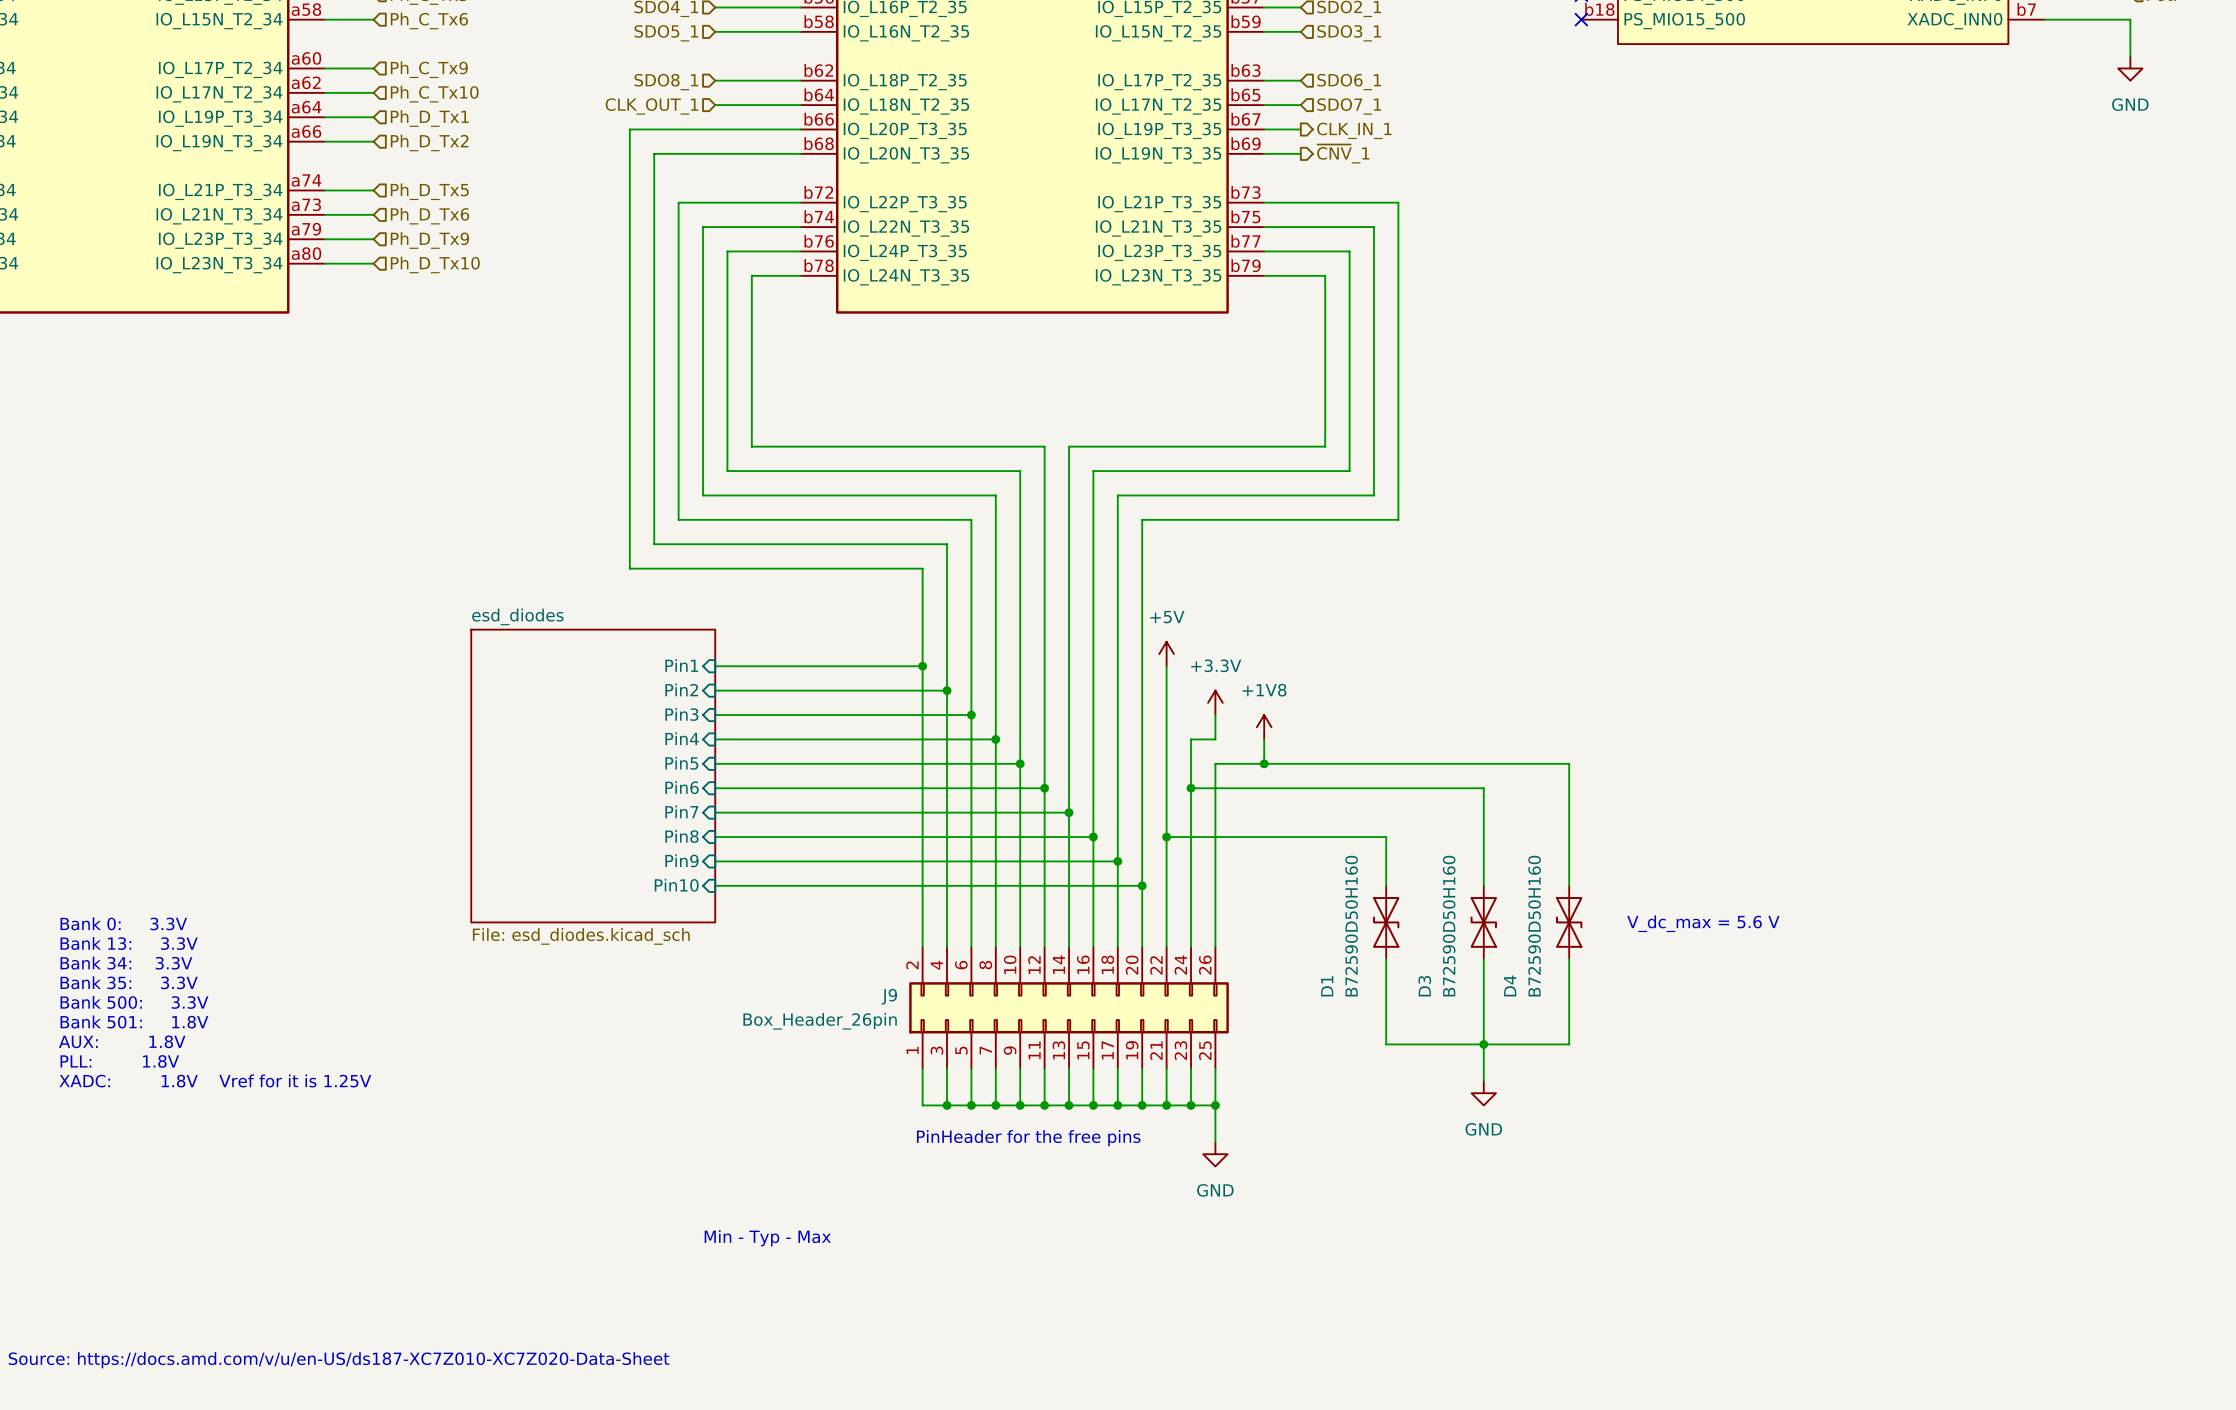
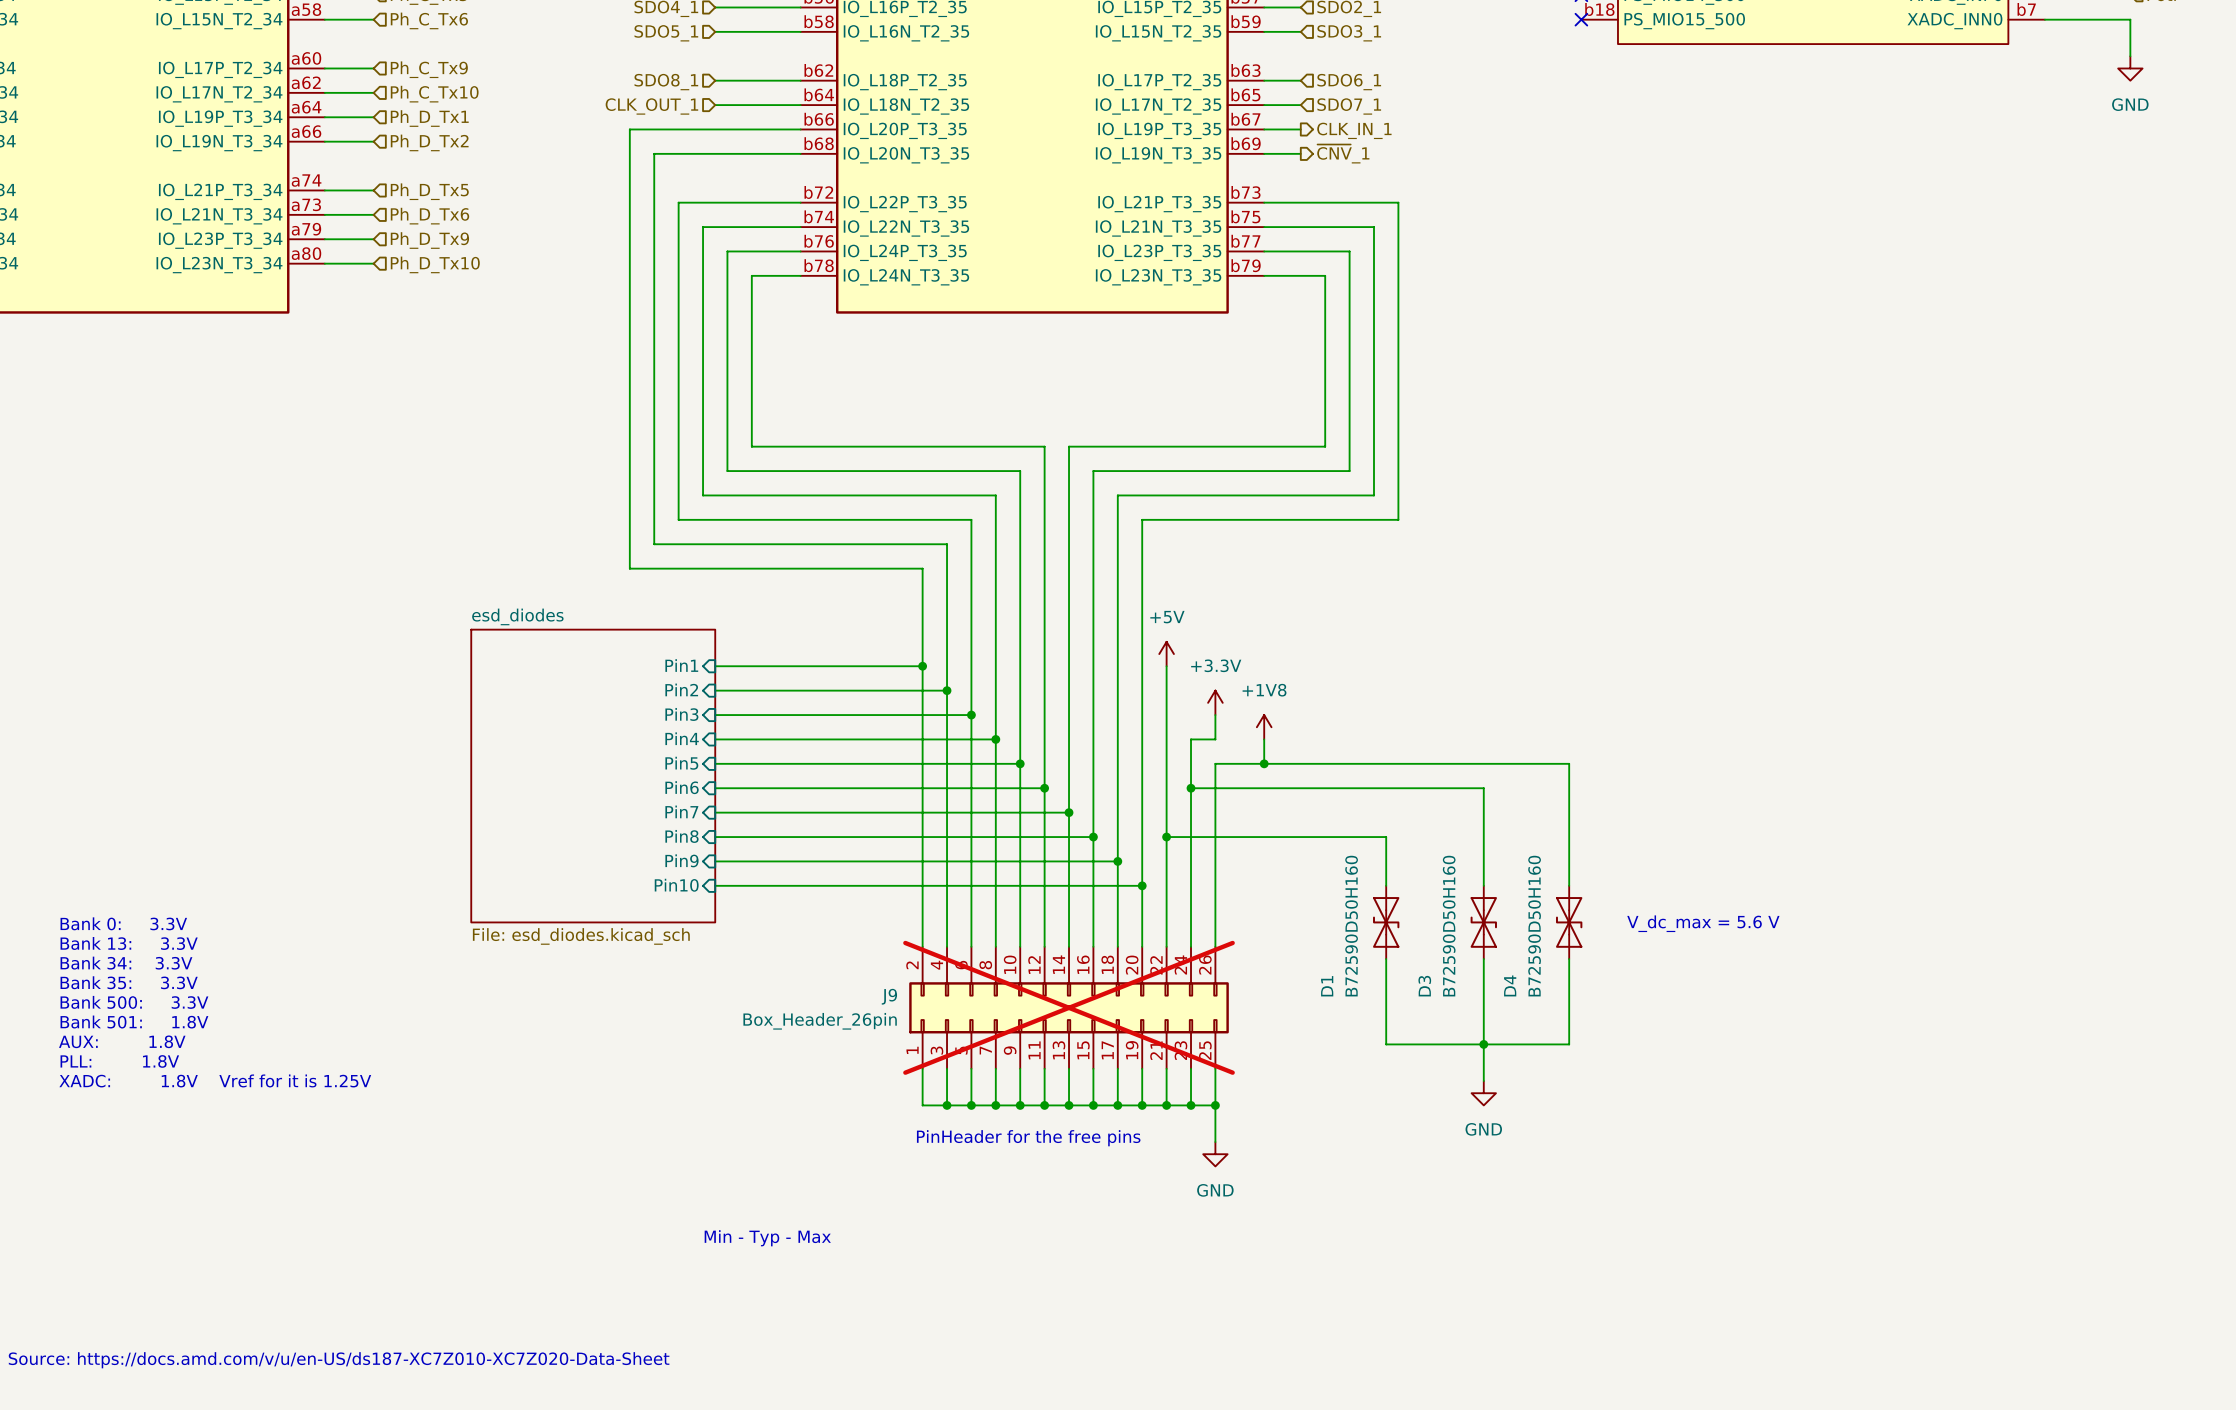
J9 do-not-place cross: none -> (1069, 1007)

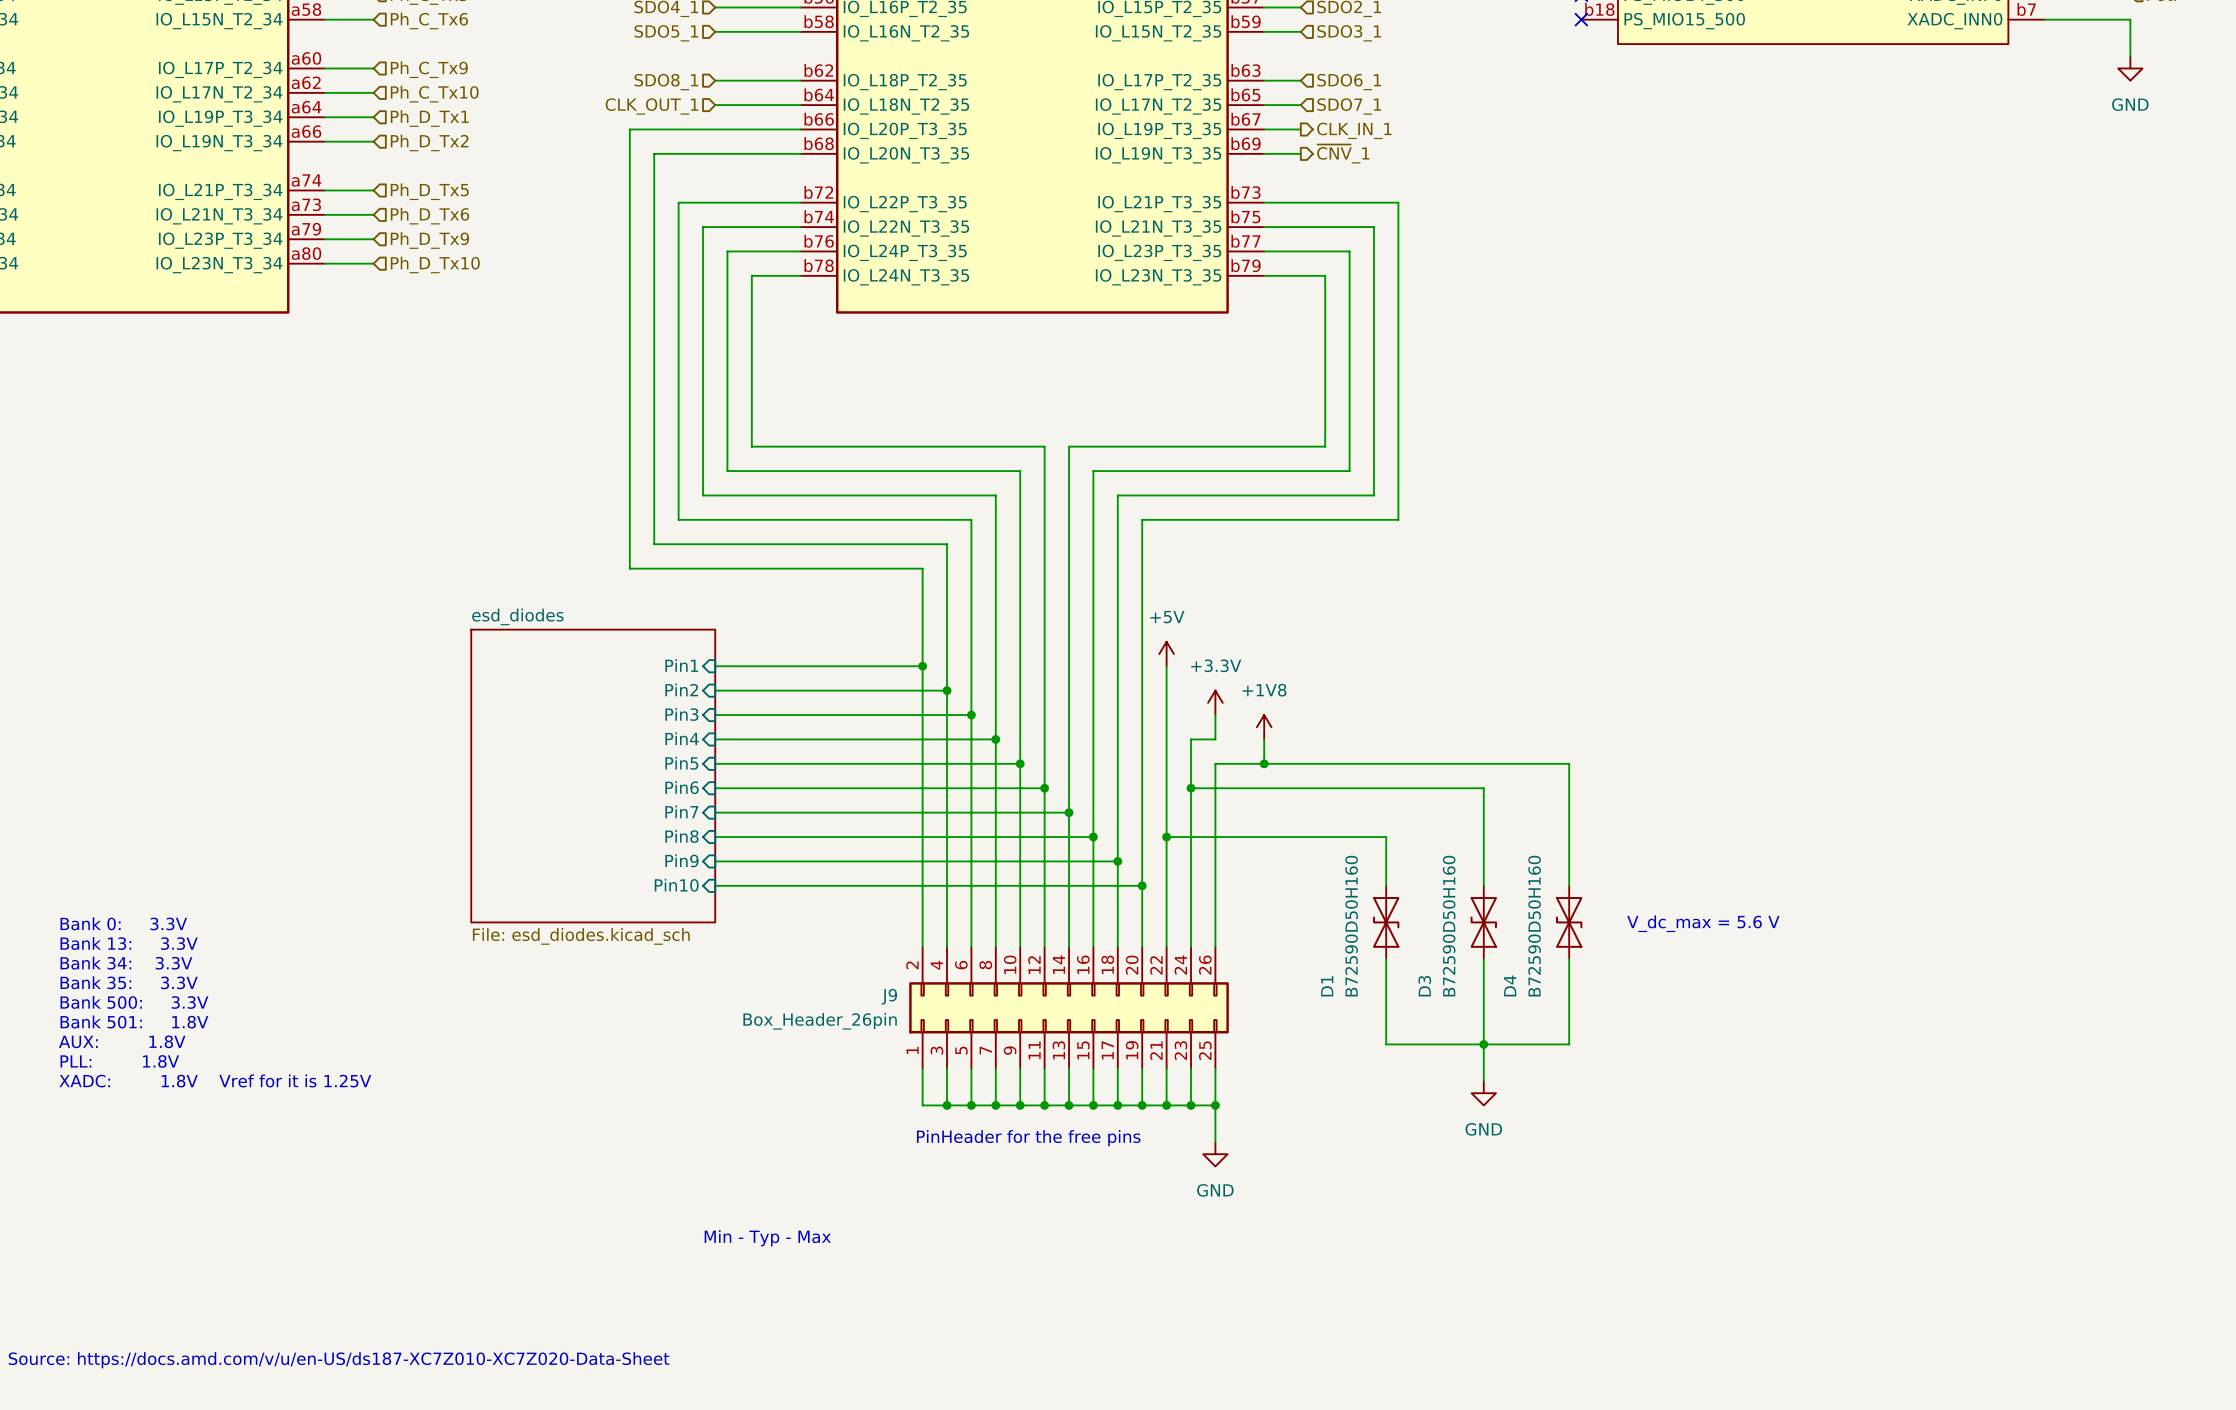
J9 do-not-place cross: (1069, 1007) -> none

